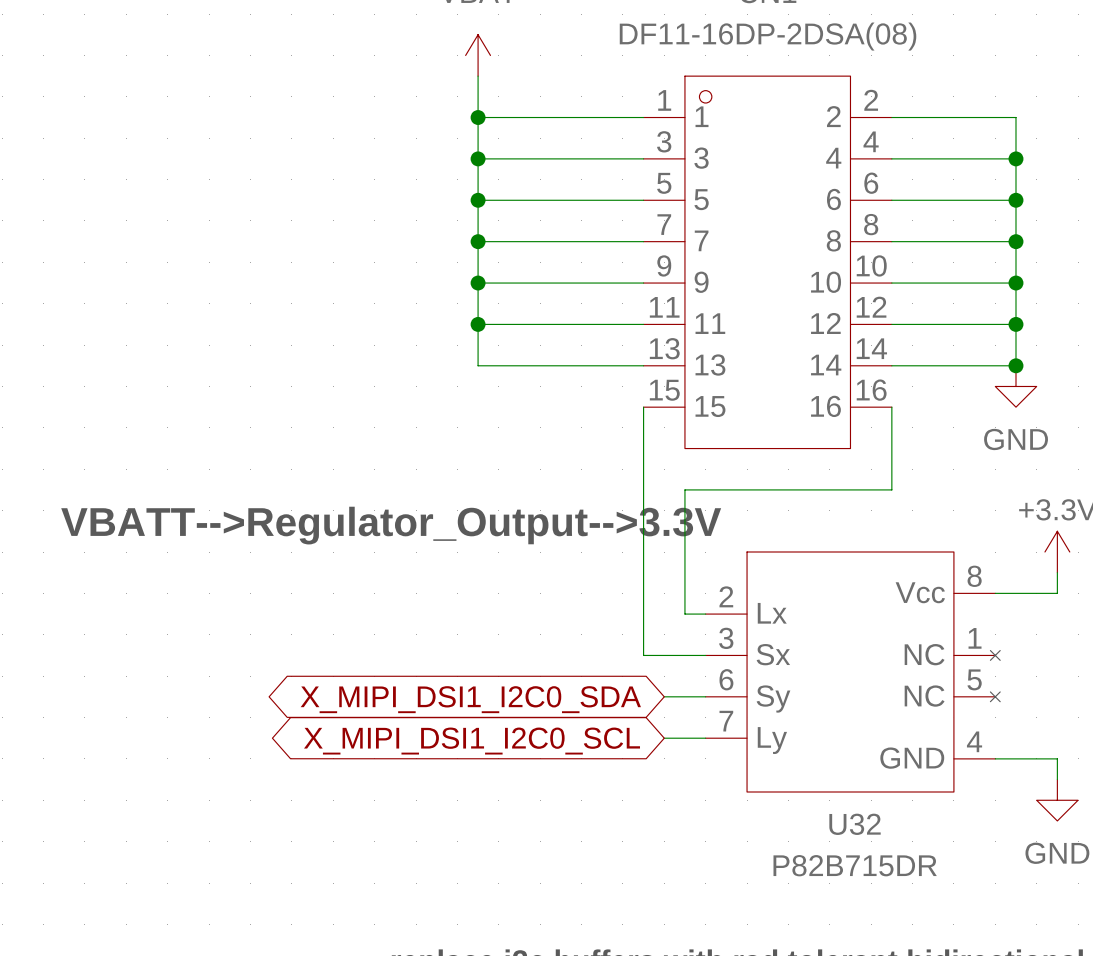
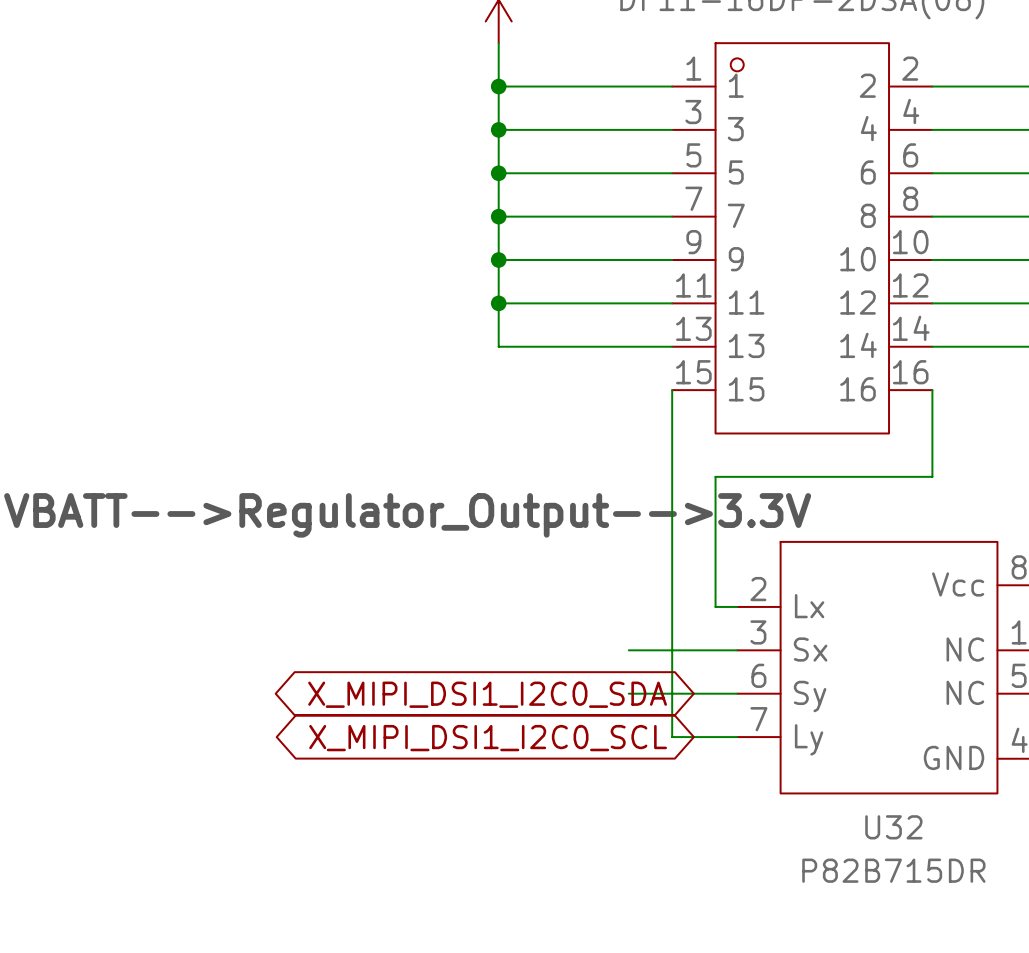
wire: none -> (628, 650) (672, 650) (672, 737) (693, 737)
wire: none -> (628, 693) (693, 693)

